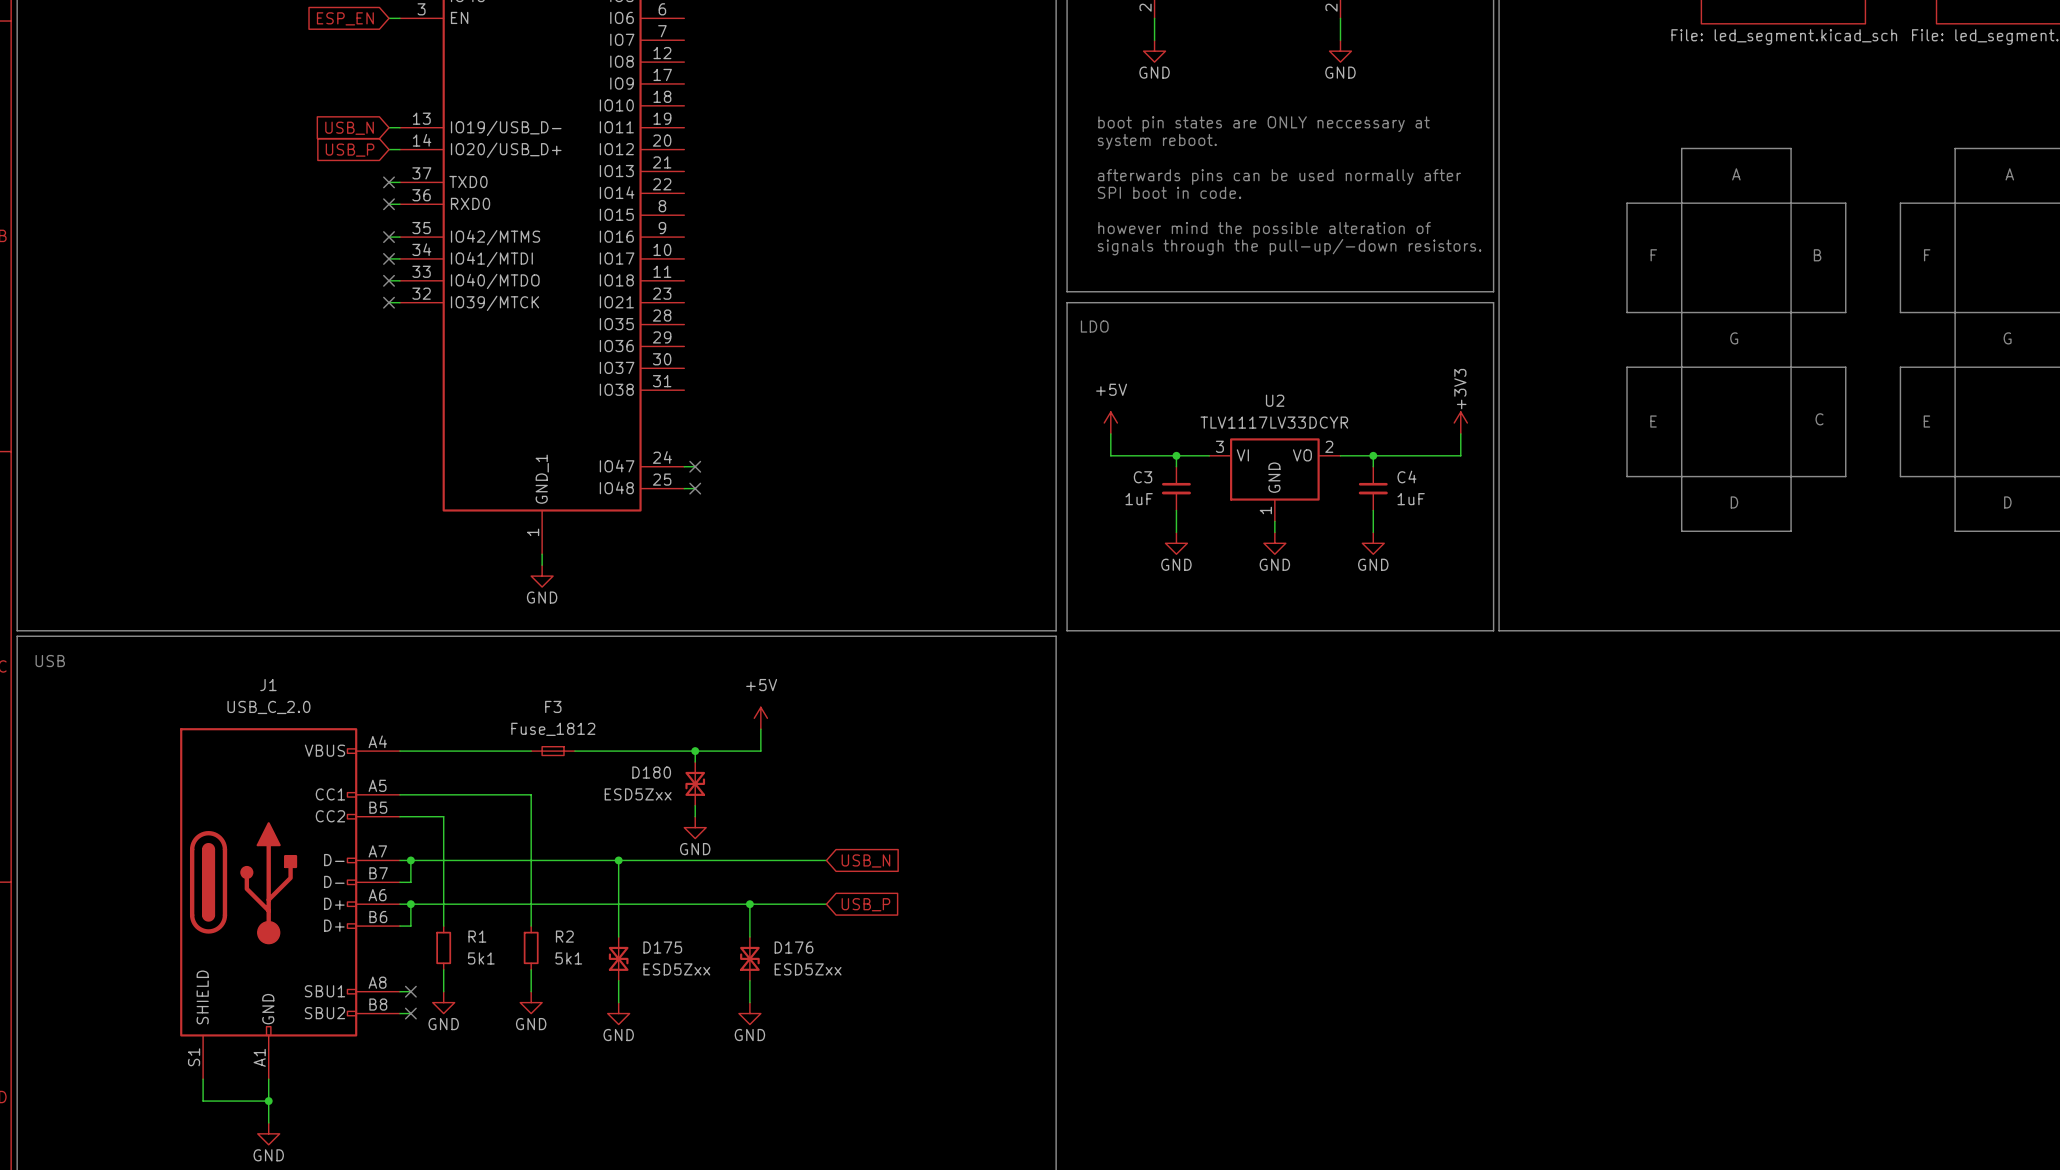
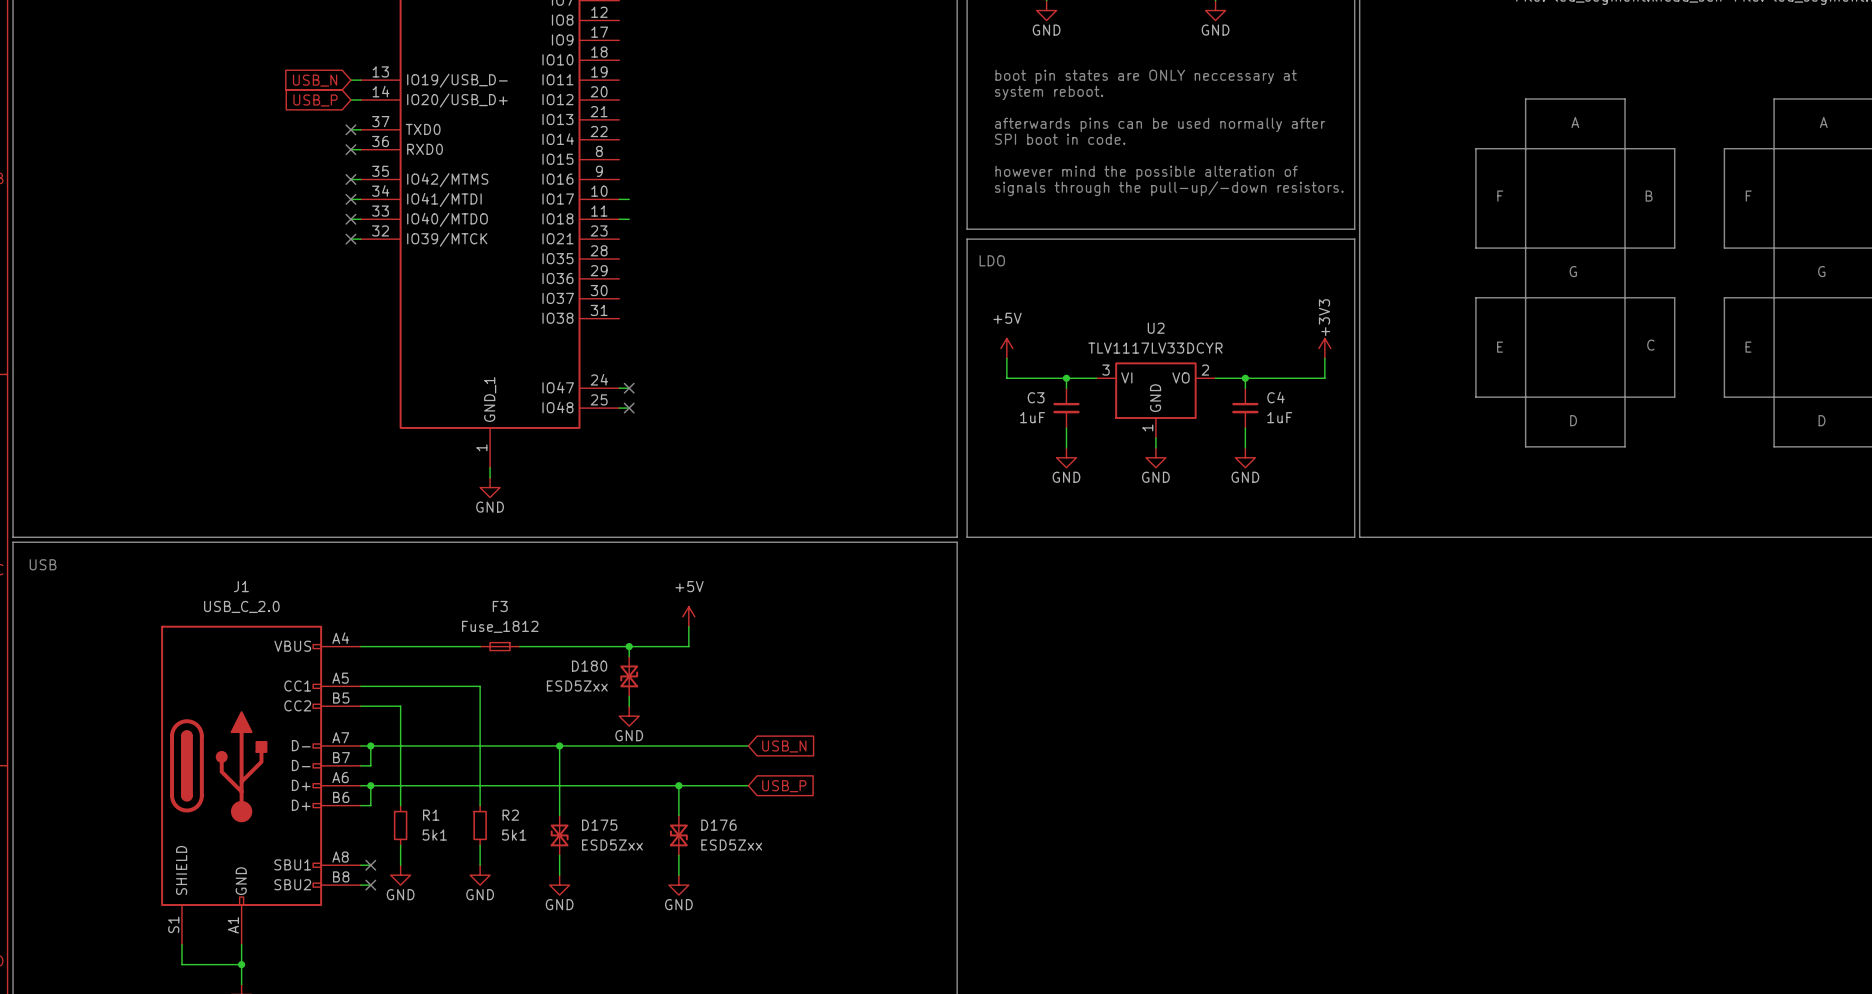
wire: none -> (619, 199) (629, 199)
wire: none -> (619, 219) (629, 219)

